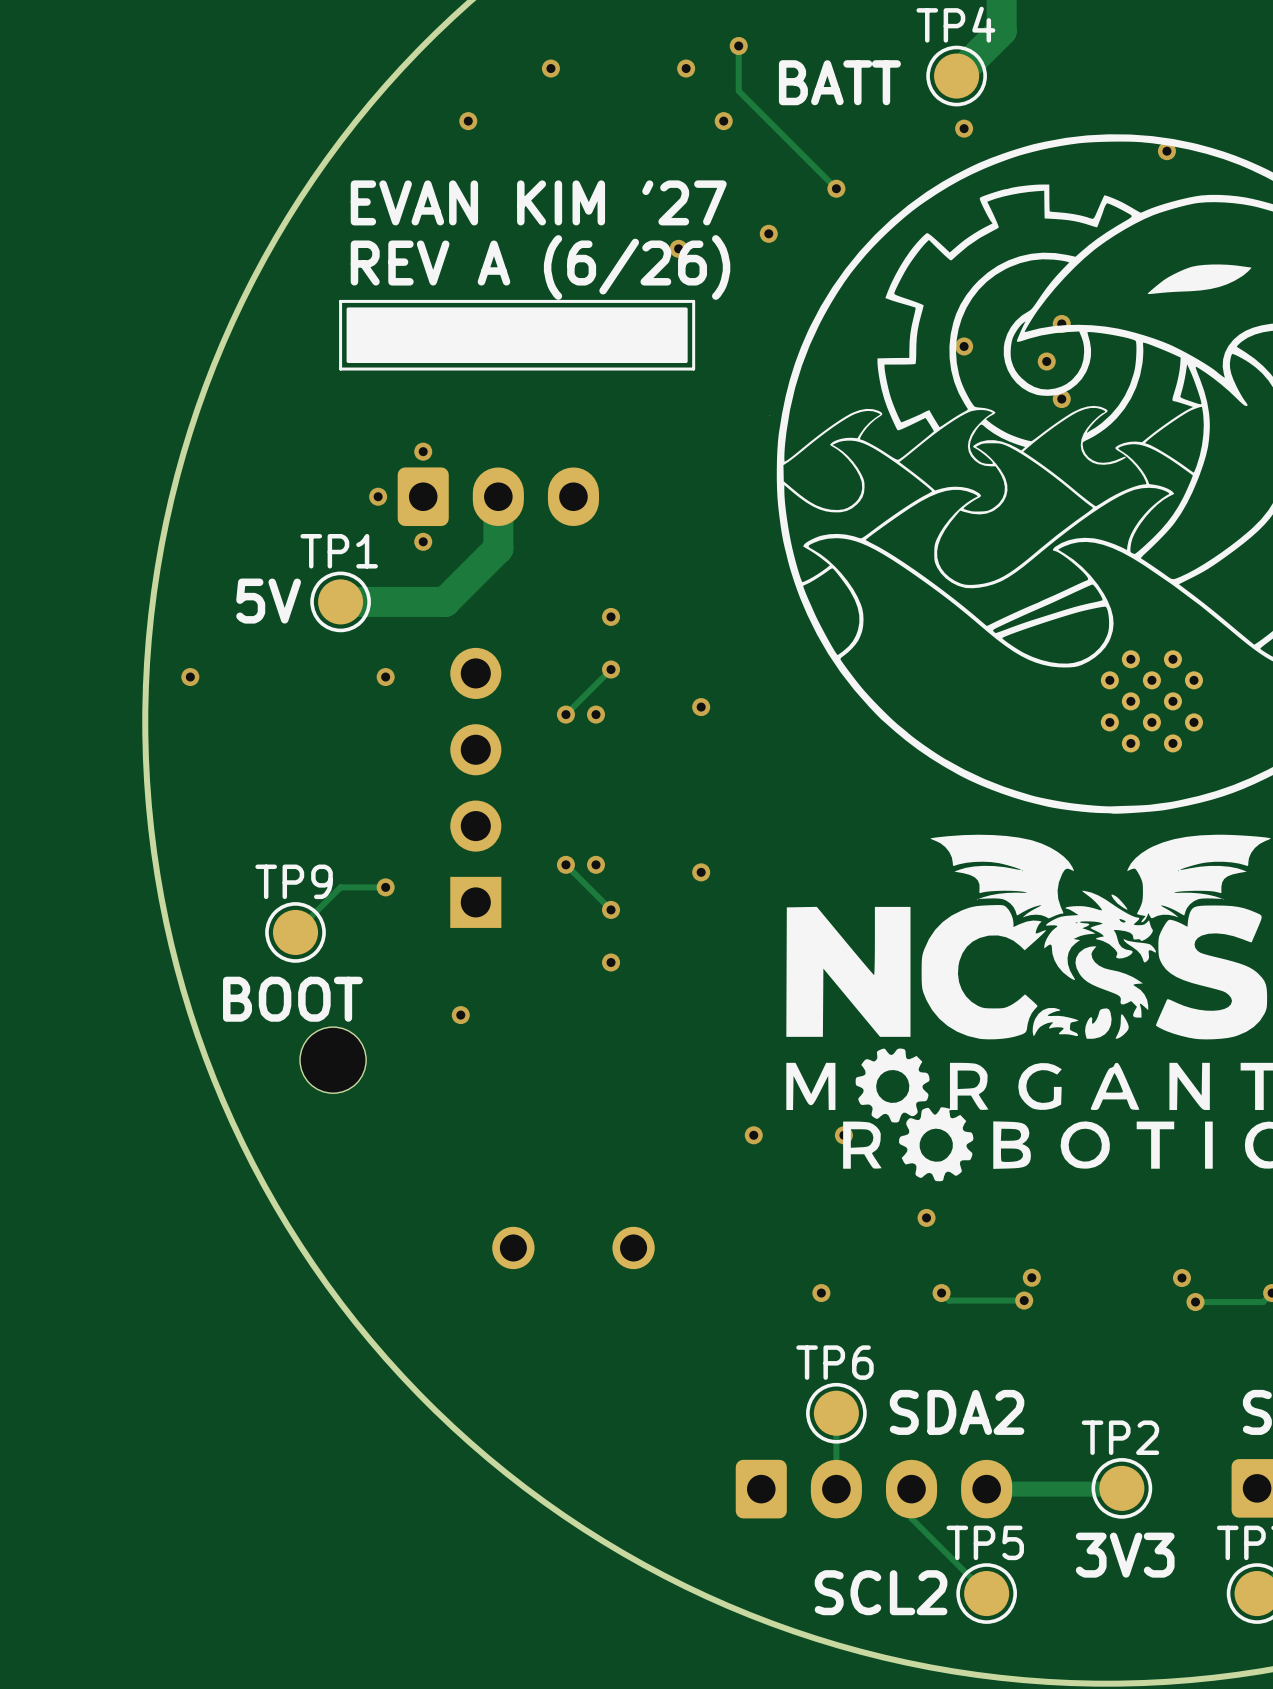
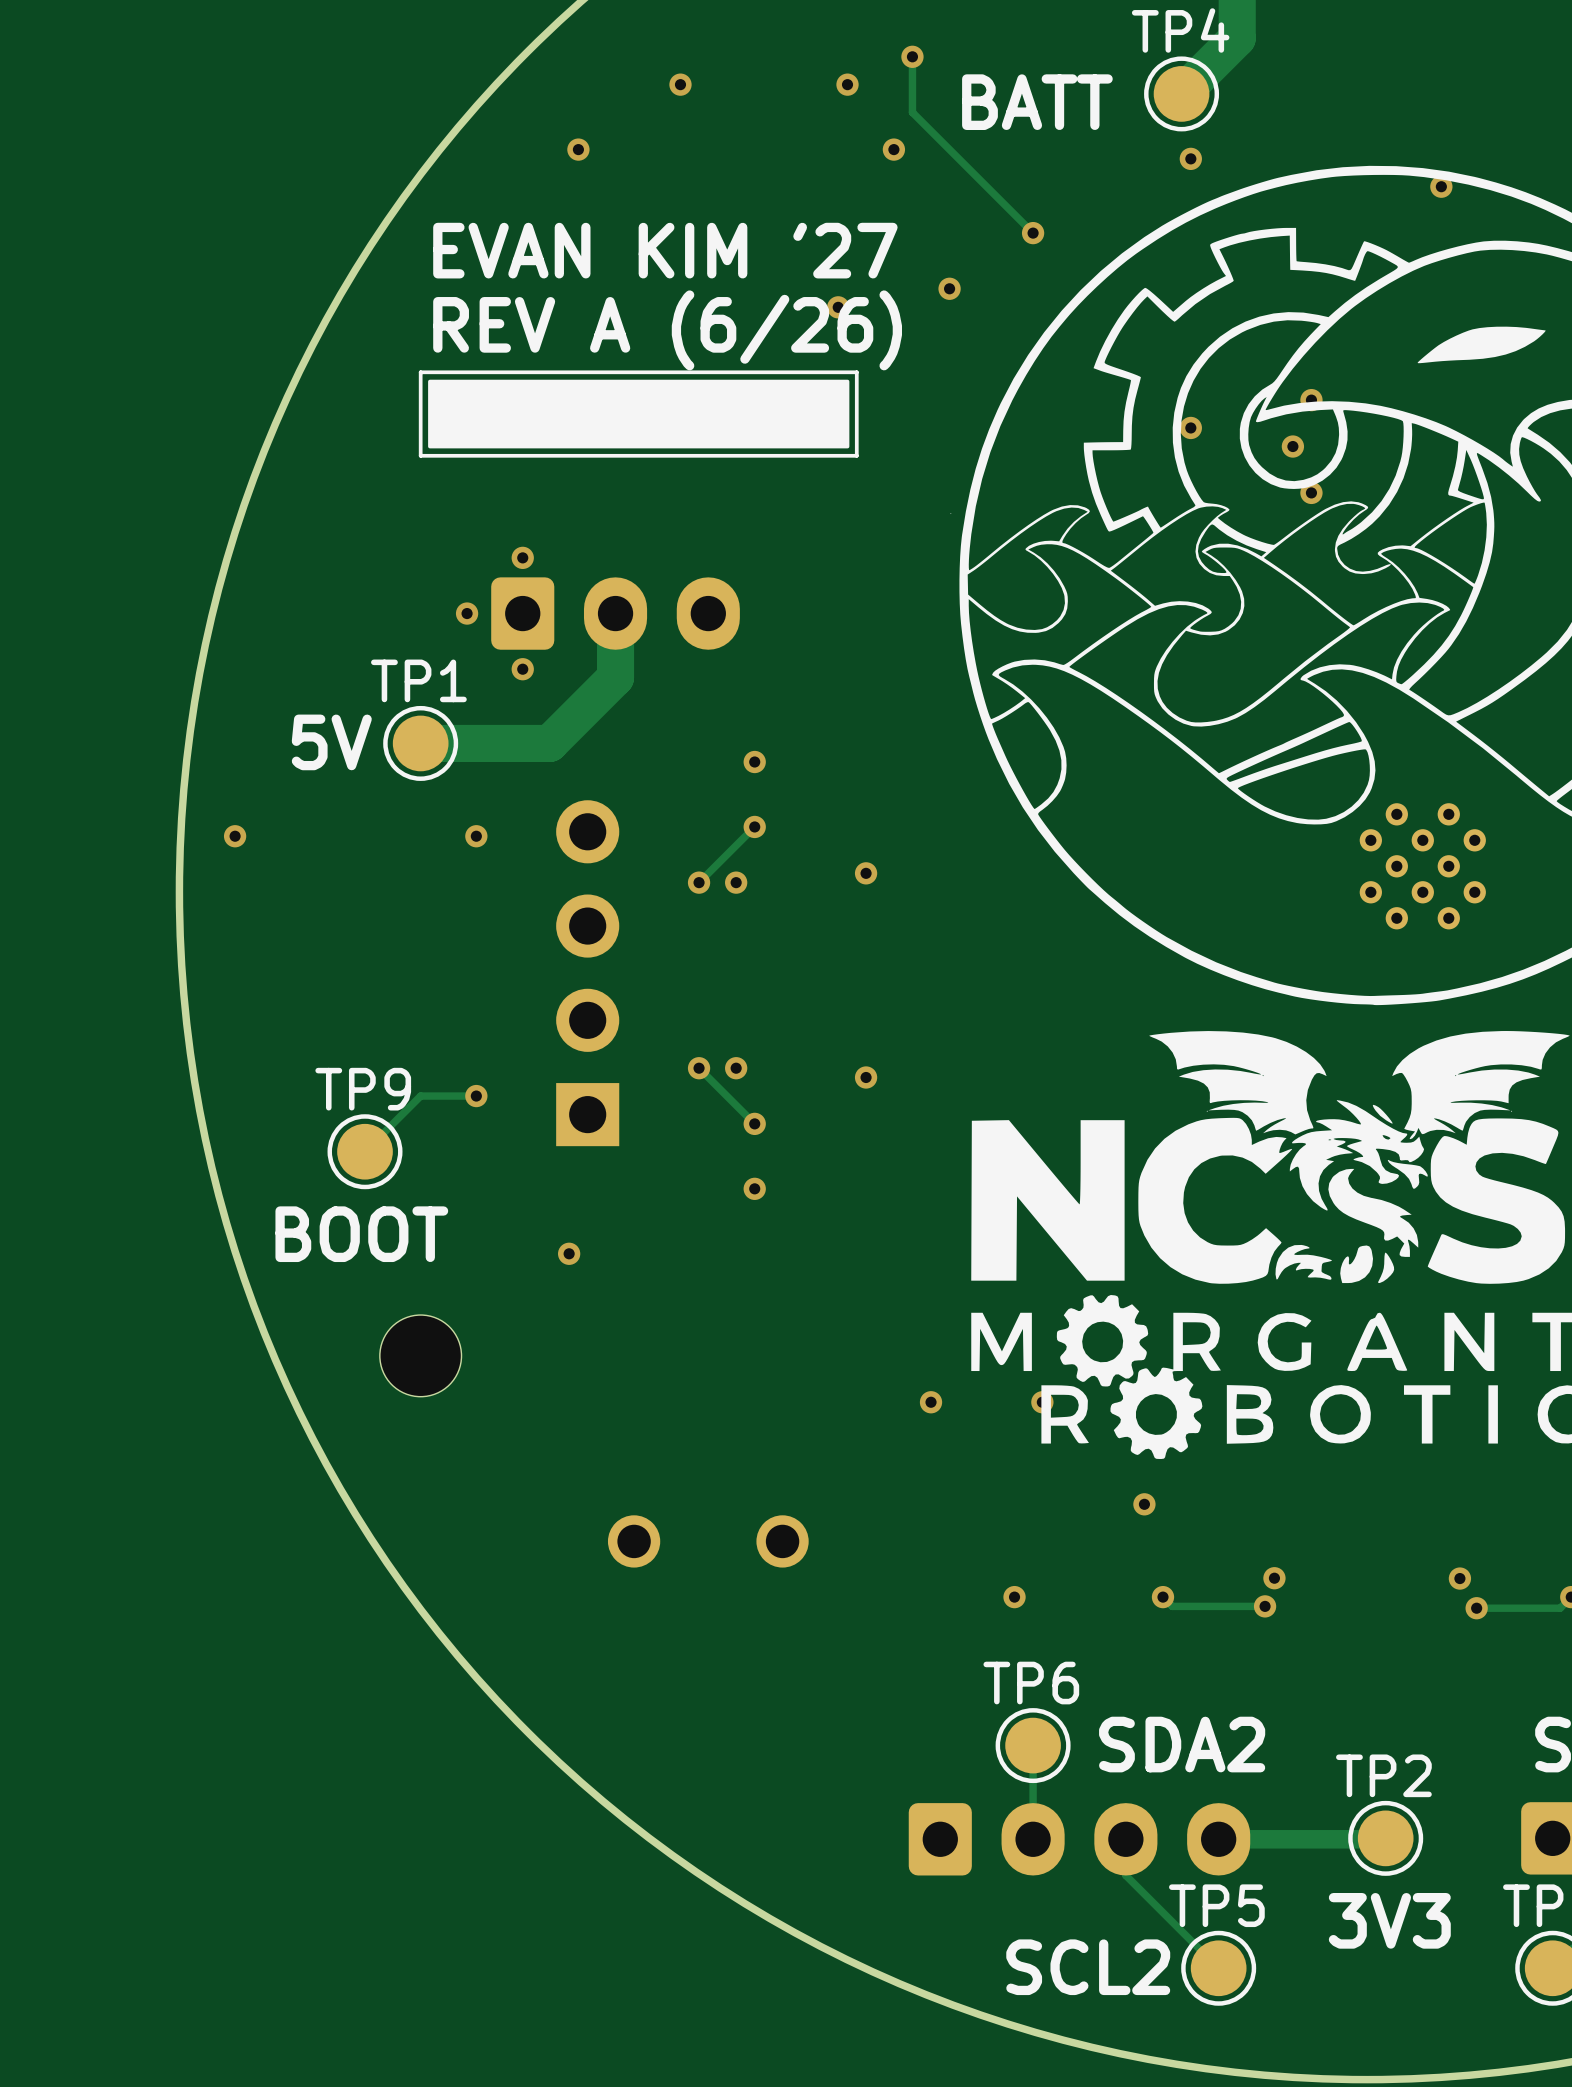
part position: (333, 1060) -> (420, 1355)

